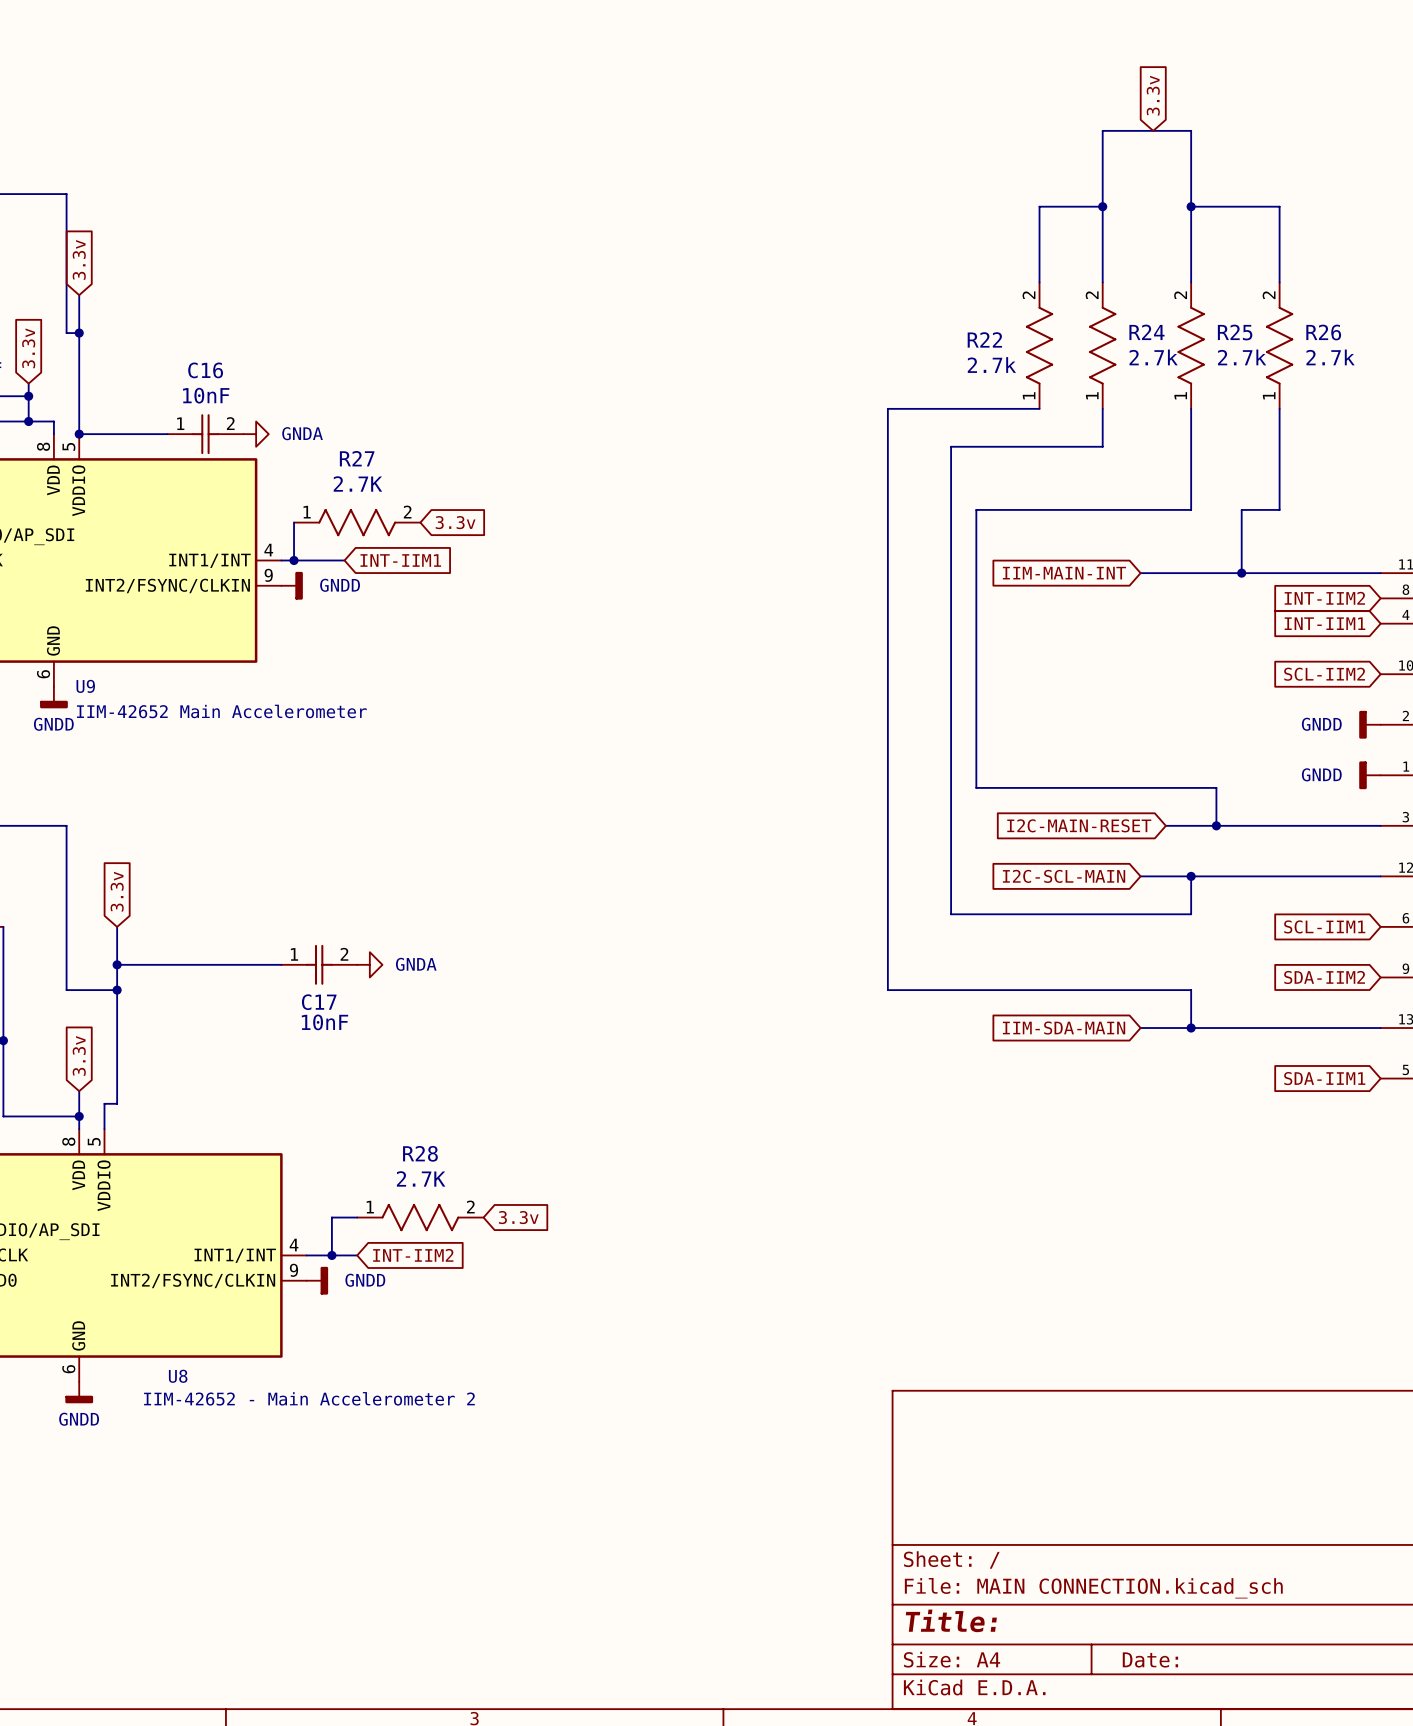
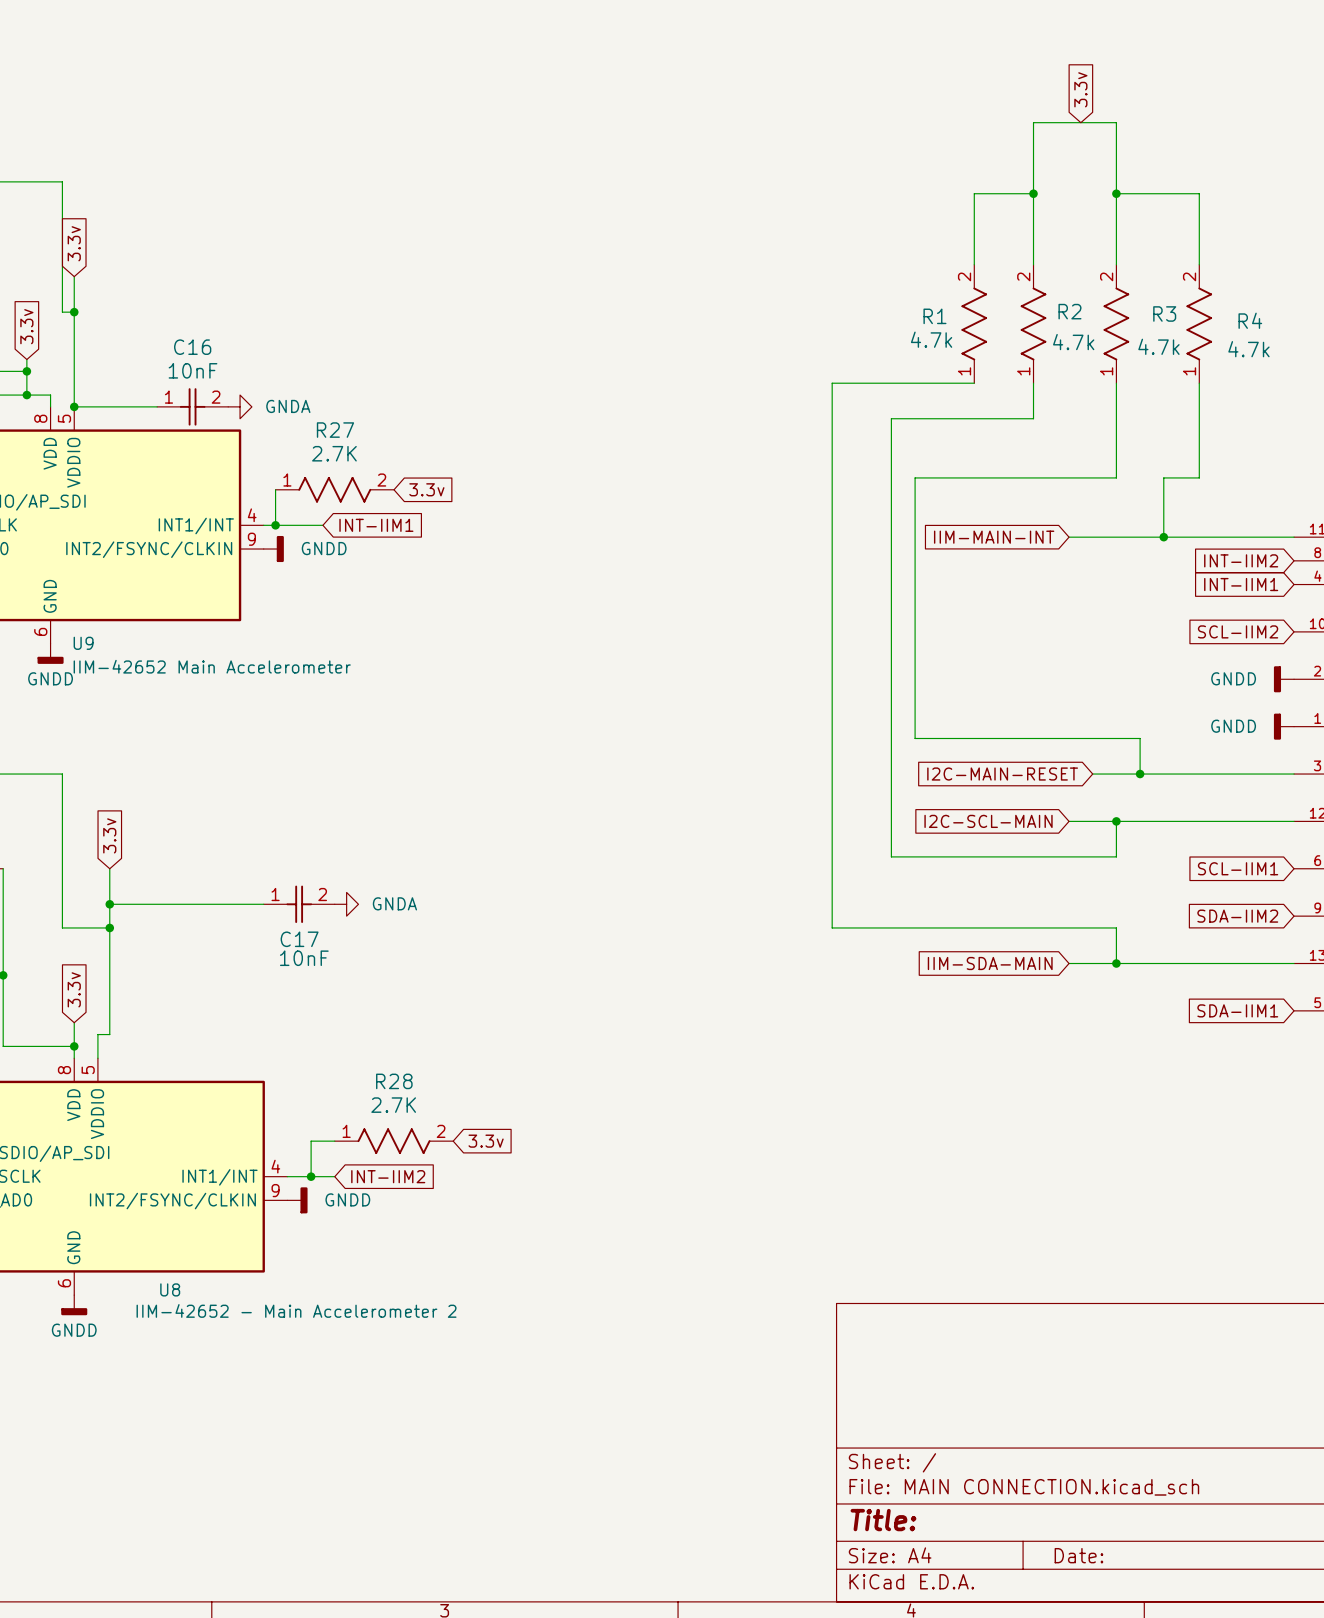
R24 name: R24 (1146, 332) -> R2 (1069, 311)
R25 name: R25 (1235, 332) -> R3 (1164, 313)
R26 name: R26 (1323, 332) -> R4 (1250, 320)
R22 name: R22 (984, 339) -> R1 (934, 316)
R24 value: 2.7k (1153, 357) -> 4.7k (1073, 342)
R25 value: 2.7k (1242, 357) -> 4.7k (1158, 346)
R26 value: 2.7k (1330, 357) -> 4.7k (1248, 349)
R22 value: 2.7k (991, 365) -> 4.7k (931, 339)

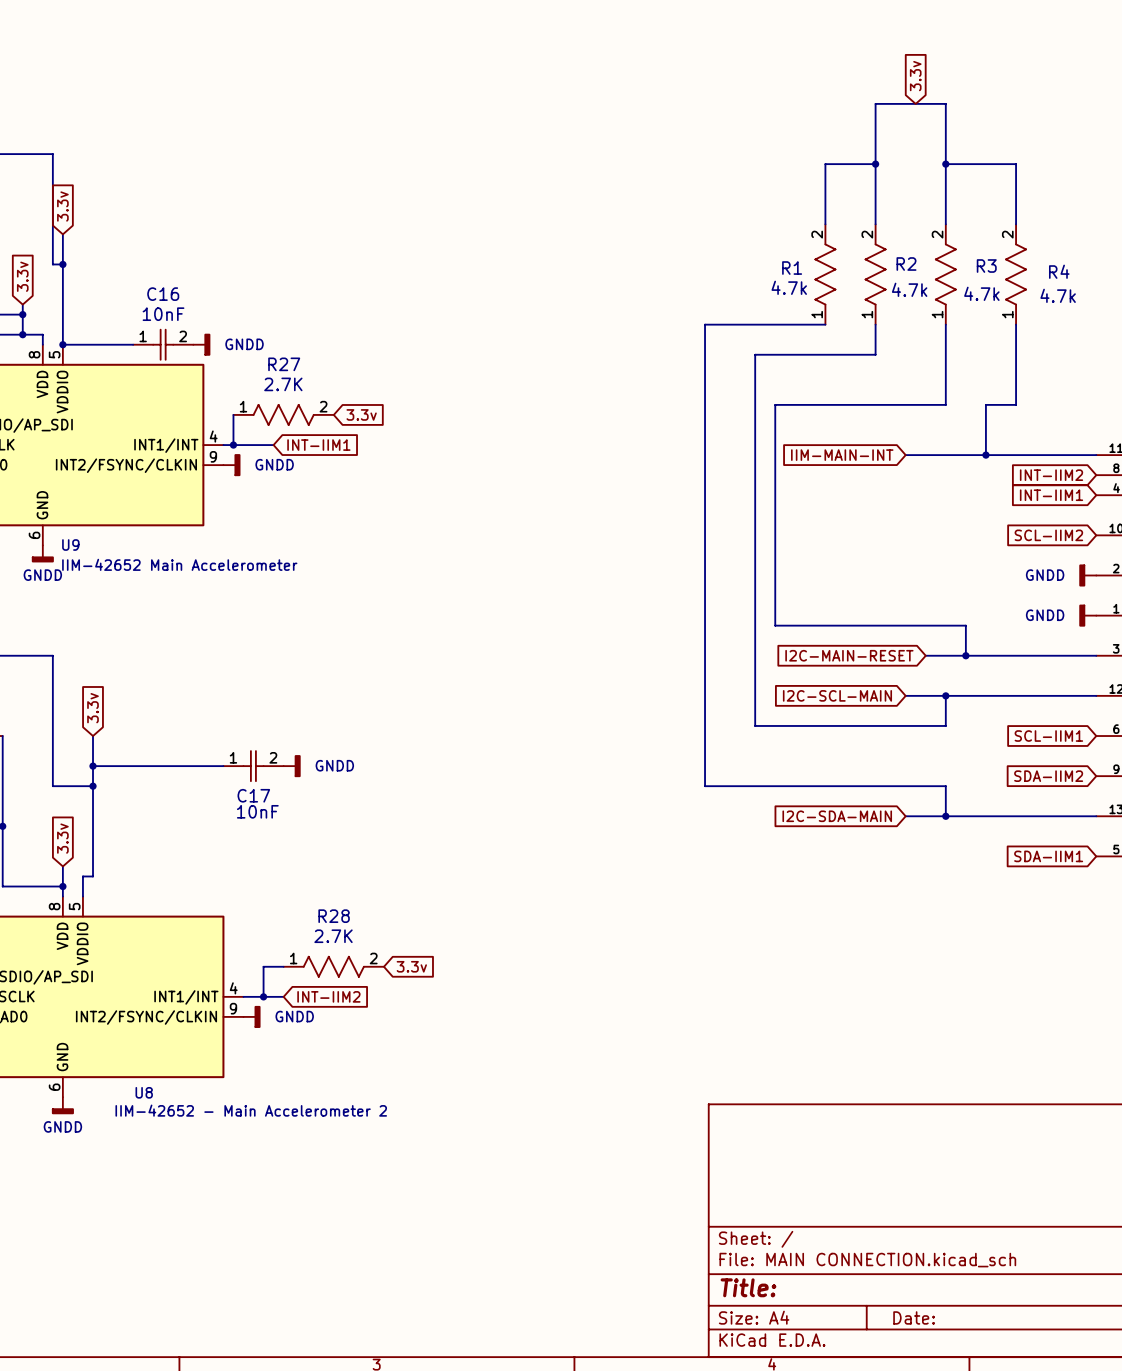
power symbol: GNDA (240, 406) -> GNDD (201, 344)
power symbol: GNDA (346, 904) -> GNDD (292, 766)
global label: IIM-SDA-MAIN (990, 963) -> I2C-SDA-MAIN (837, 816)

